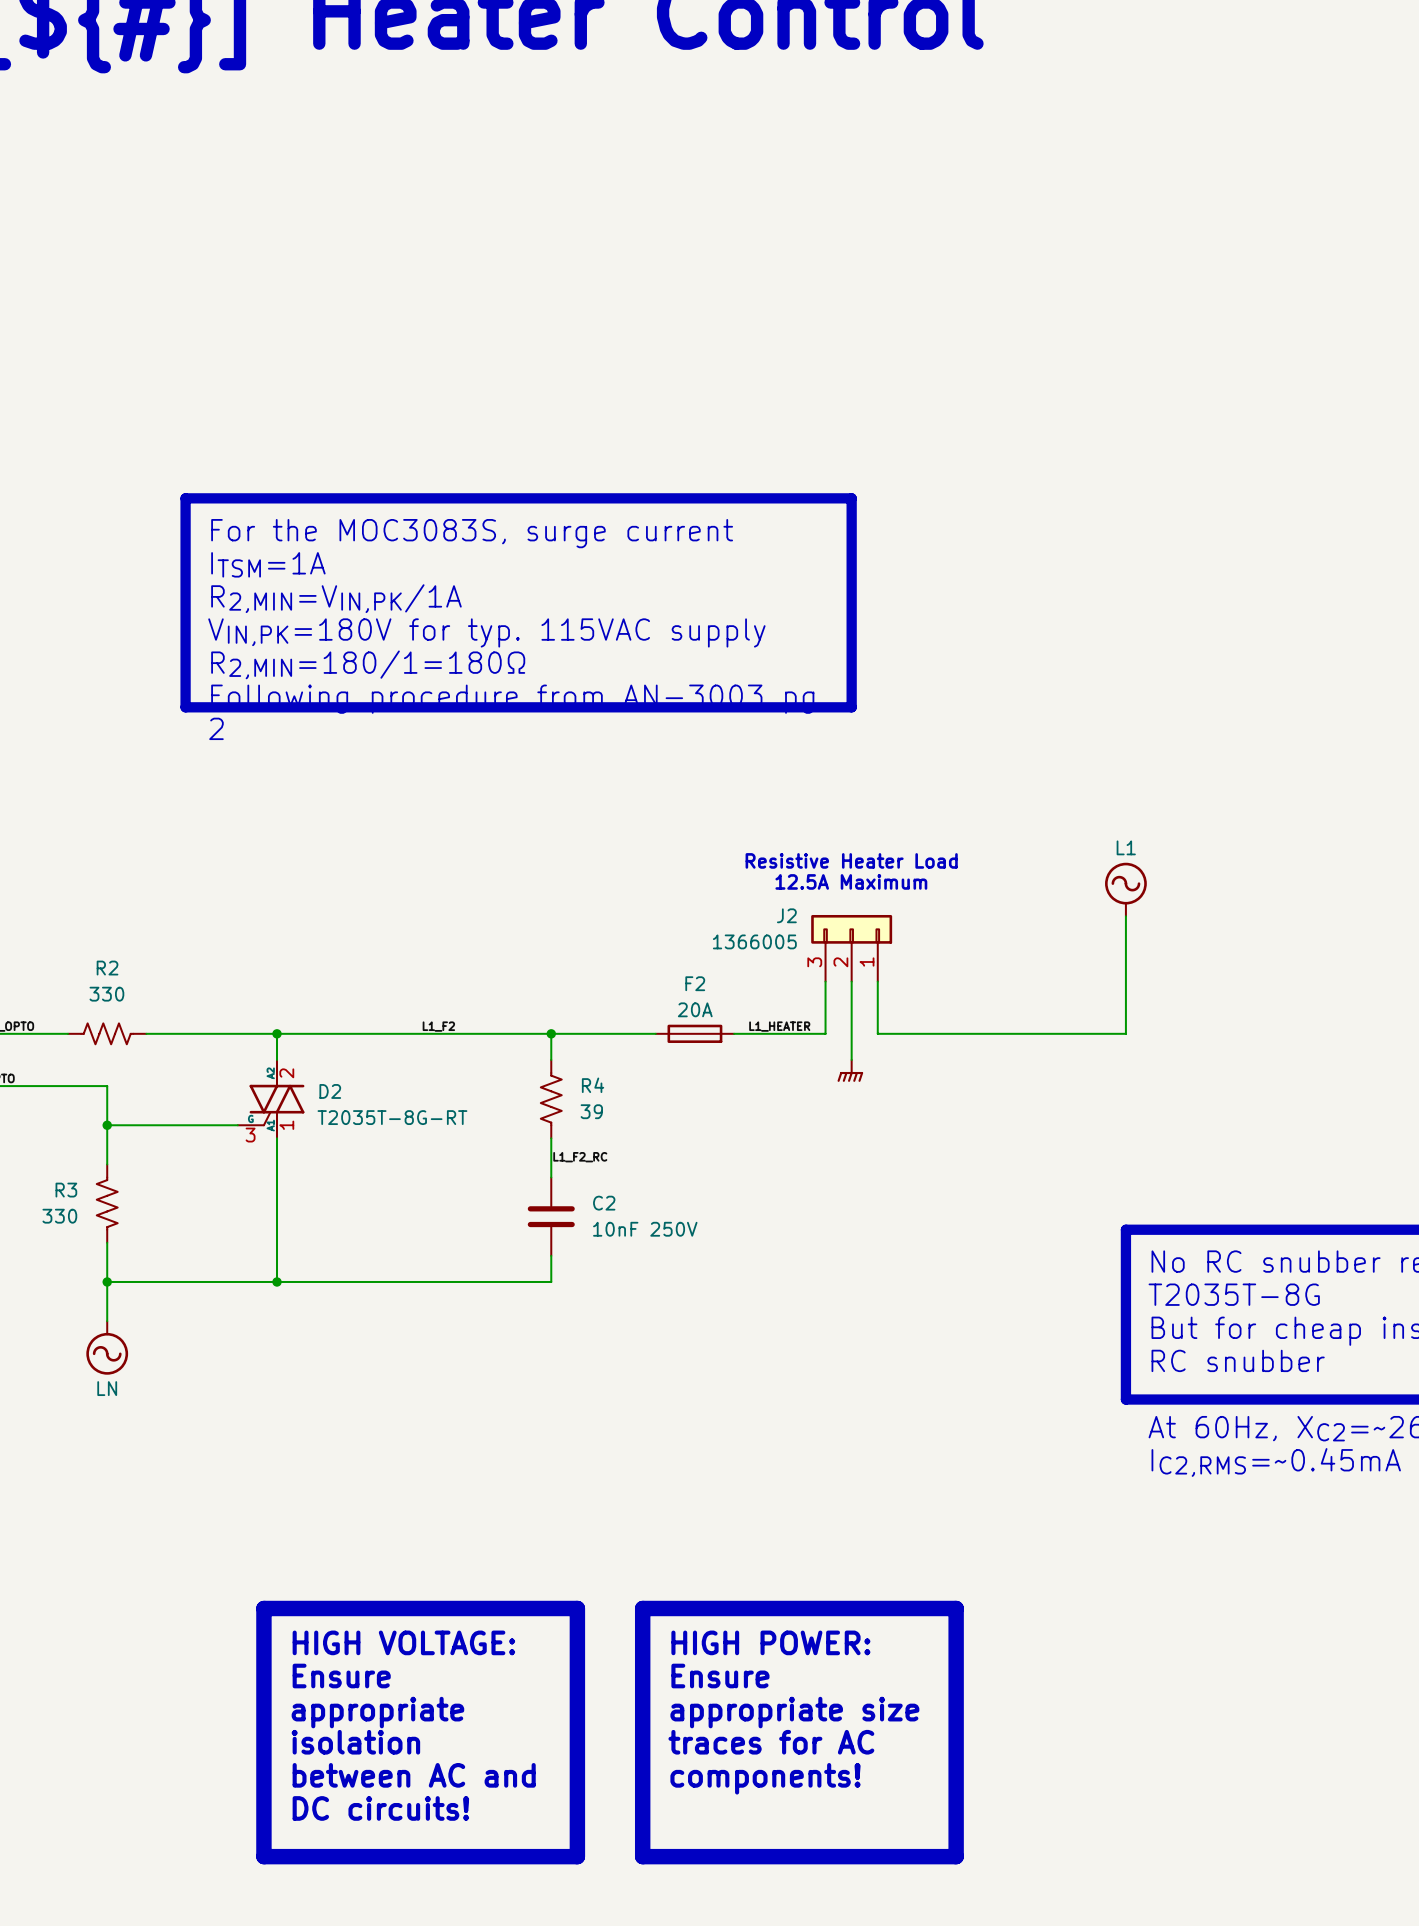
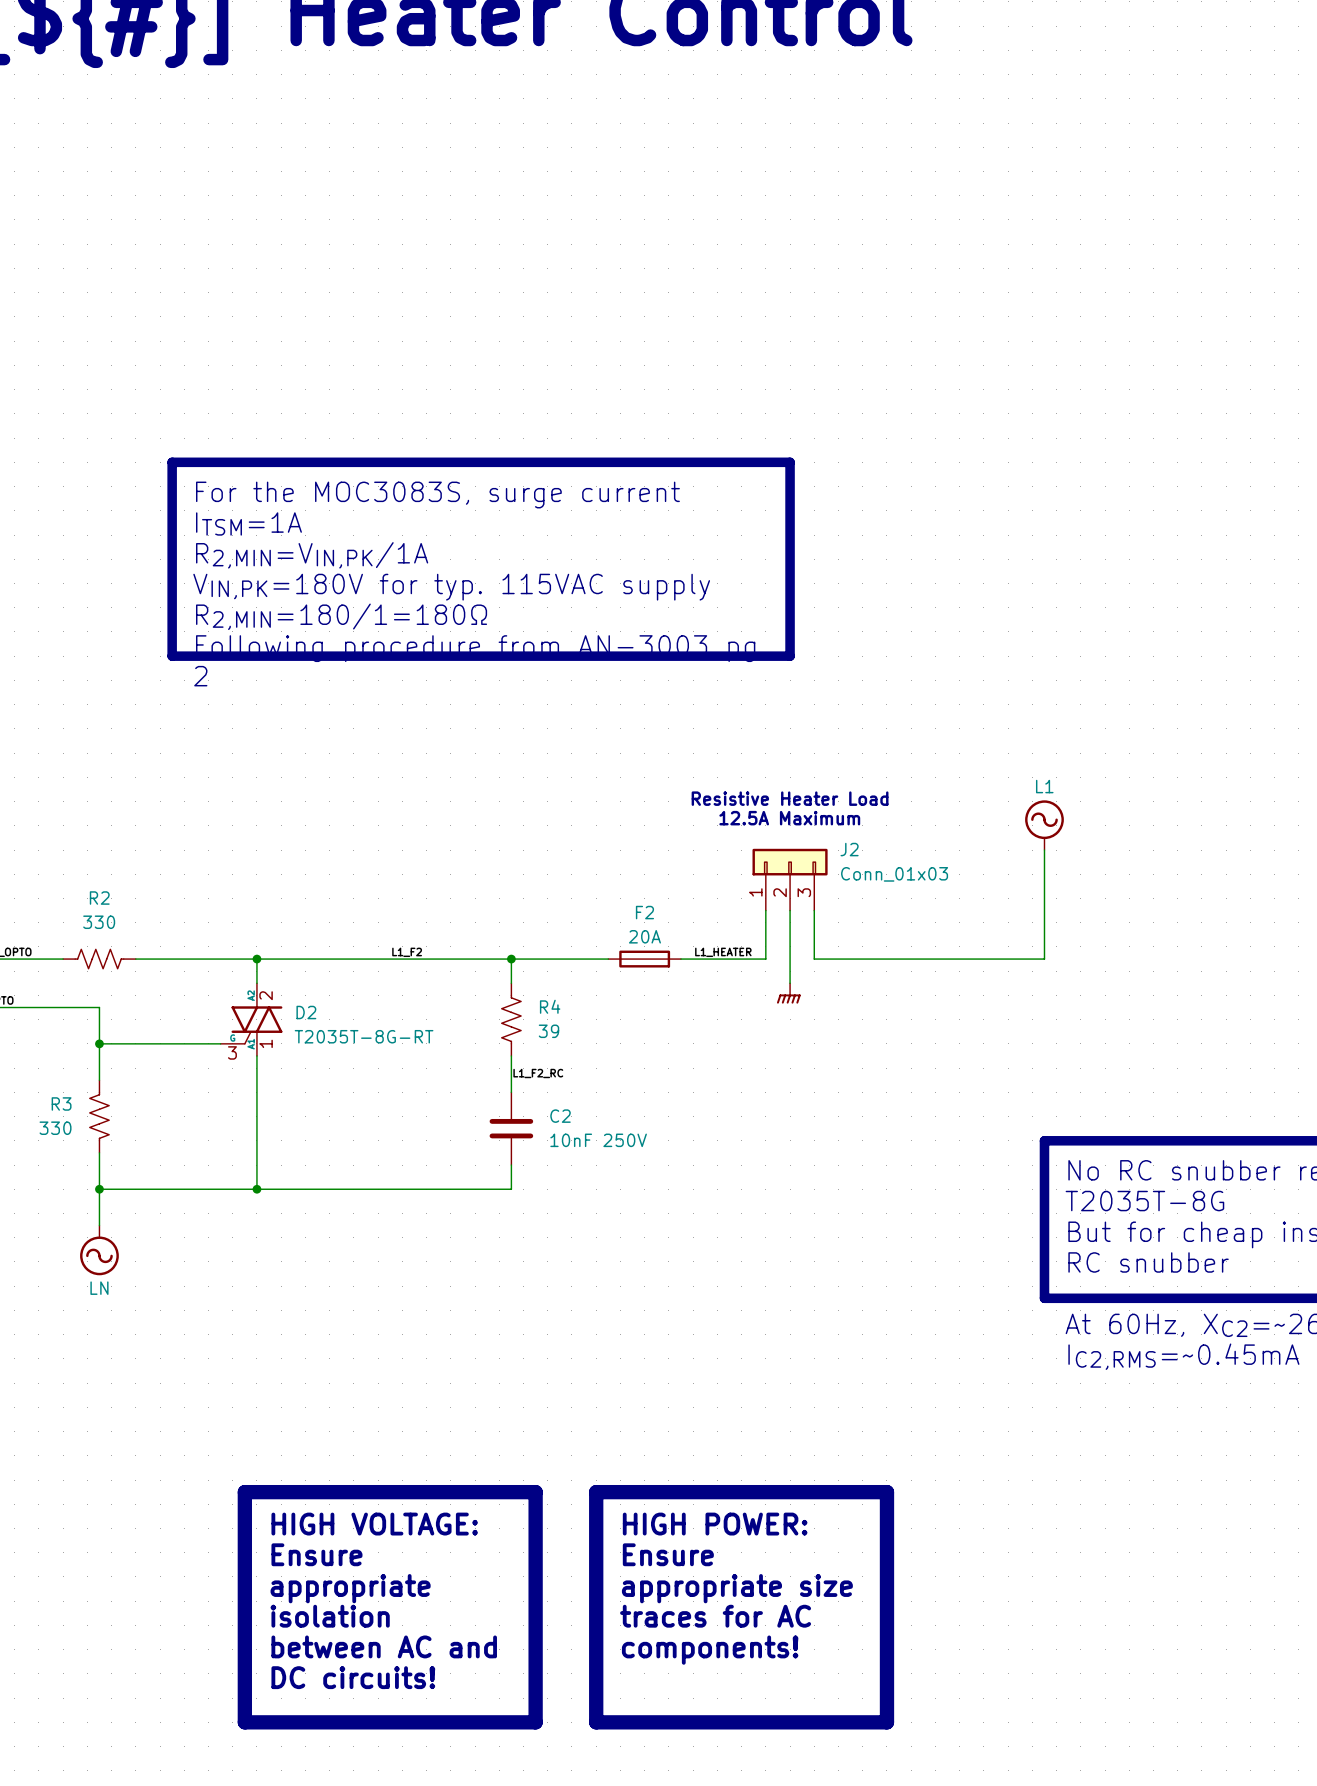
J2 flip: as is (851, 929) -> left-right (790, 862)
J2 value: 1366005 (754, 941) -> Conn_01x03 (894, 874)

